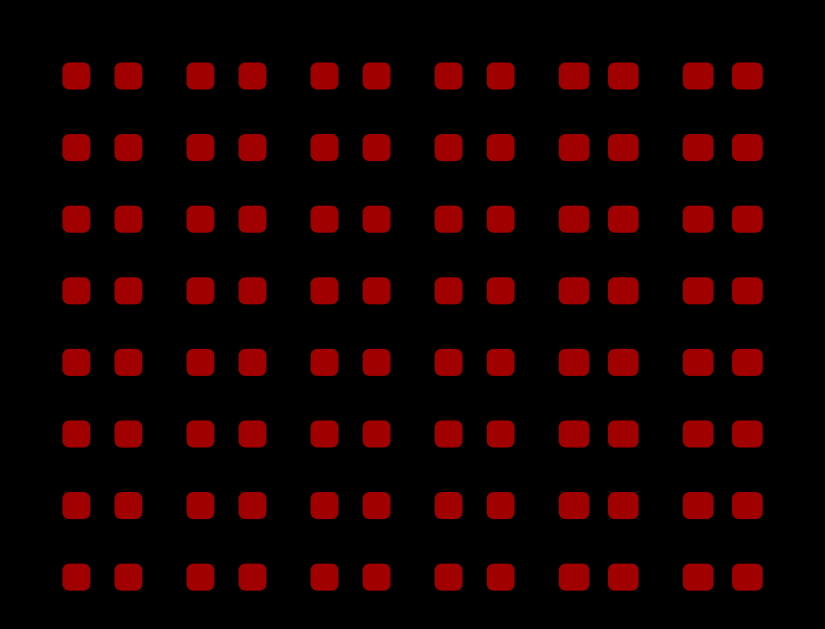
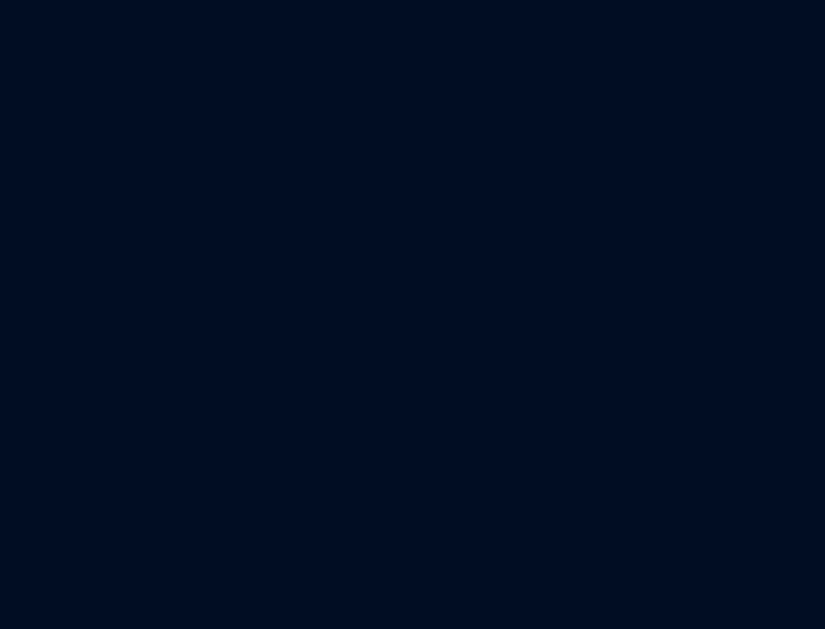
part: (102, 76) -> none
part: (226, 76) -> none
part: (350, 76) -> none
part: (474, 76) -> none
part: (598, 76) -> none
part: (722, 76) -> none
part: (102, 147) -> none
part: (226, 147) -> none
part: (350, 147) -> none
part: (474, 147) -> none
part: (598, 147) -> none
part: (722, 147) -> none
part: (102, 219) -> none
part: (226, 219) -> none
part: (350, 219) -> none
part: (474, 219) -> none
part: (598, 219) -> none
part: (722, 219) -> none
part: (102, 290) -> none
part: (226, 290) -> none
part: (350, 290) -> none
part: (474, 290) -> none
part: (598, 290) -> none
part: (722, 290) -> none
part: (102, 362) -> none
part: (226, 362) -> none
part: (350, 362) -> none
part: (474, 362) -> none
part: (598, 362) -> none
part: (722, 362) -> none
part: (102, 433) -> none
part: (226, 433) -> none
part: (350, 433) -> none
part: (474, 433) -> none
part: (598, 433) -> none
part: (722, 433) -> none
part: (102, 505) -> none
part: (226, 505) -> none
part: (350, 505) -> none
part: (474, 505) -> none
part: (598, 505) -> none
part: (722, 505) -> none
part: (102, 577) -> none
part: (226, 577) -> none
part: (350, 577) -> none
part: (474, 577) -> none
part: (598, 577) -> none
part: (722, 577) -> none

